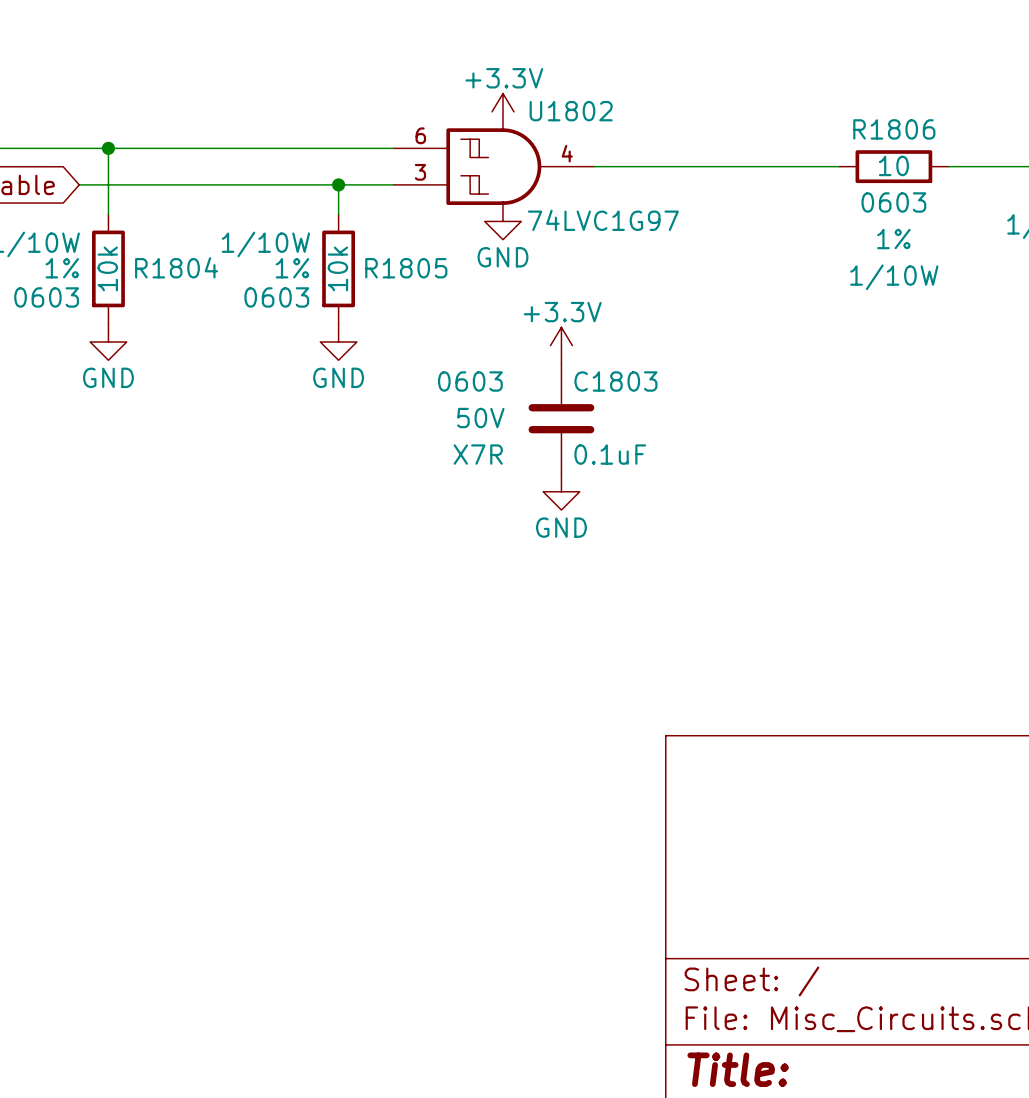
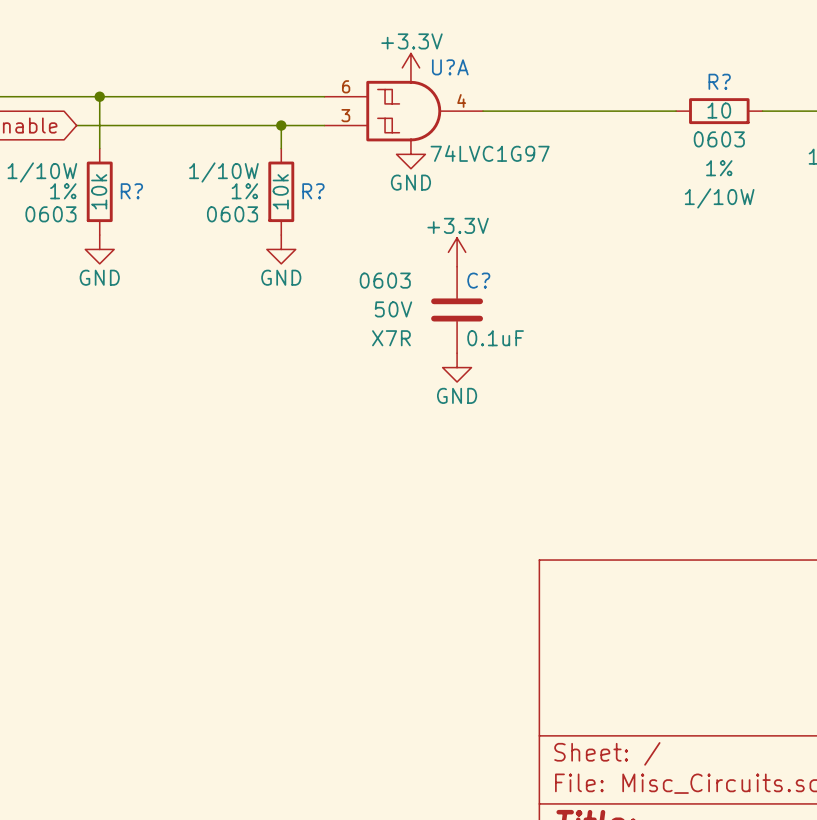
U1802 name: U1802 (571, 111) -> U?A (450, 67)
R1806 name: R1806 (894, 129) -> R? (719, 81)
R1804 name: R1804 (176, 267) -> R? (131, 191)
R1805 name: R1805 (406, 268) -> R? (313, 191)
C1803 name: C1803 (615, 381) -> C? (478, 280)

